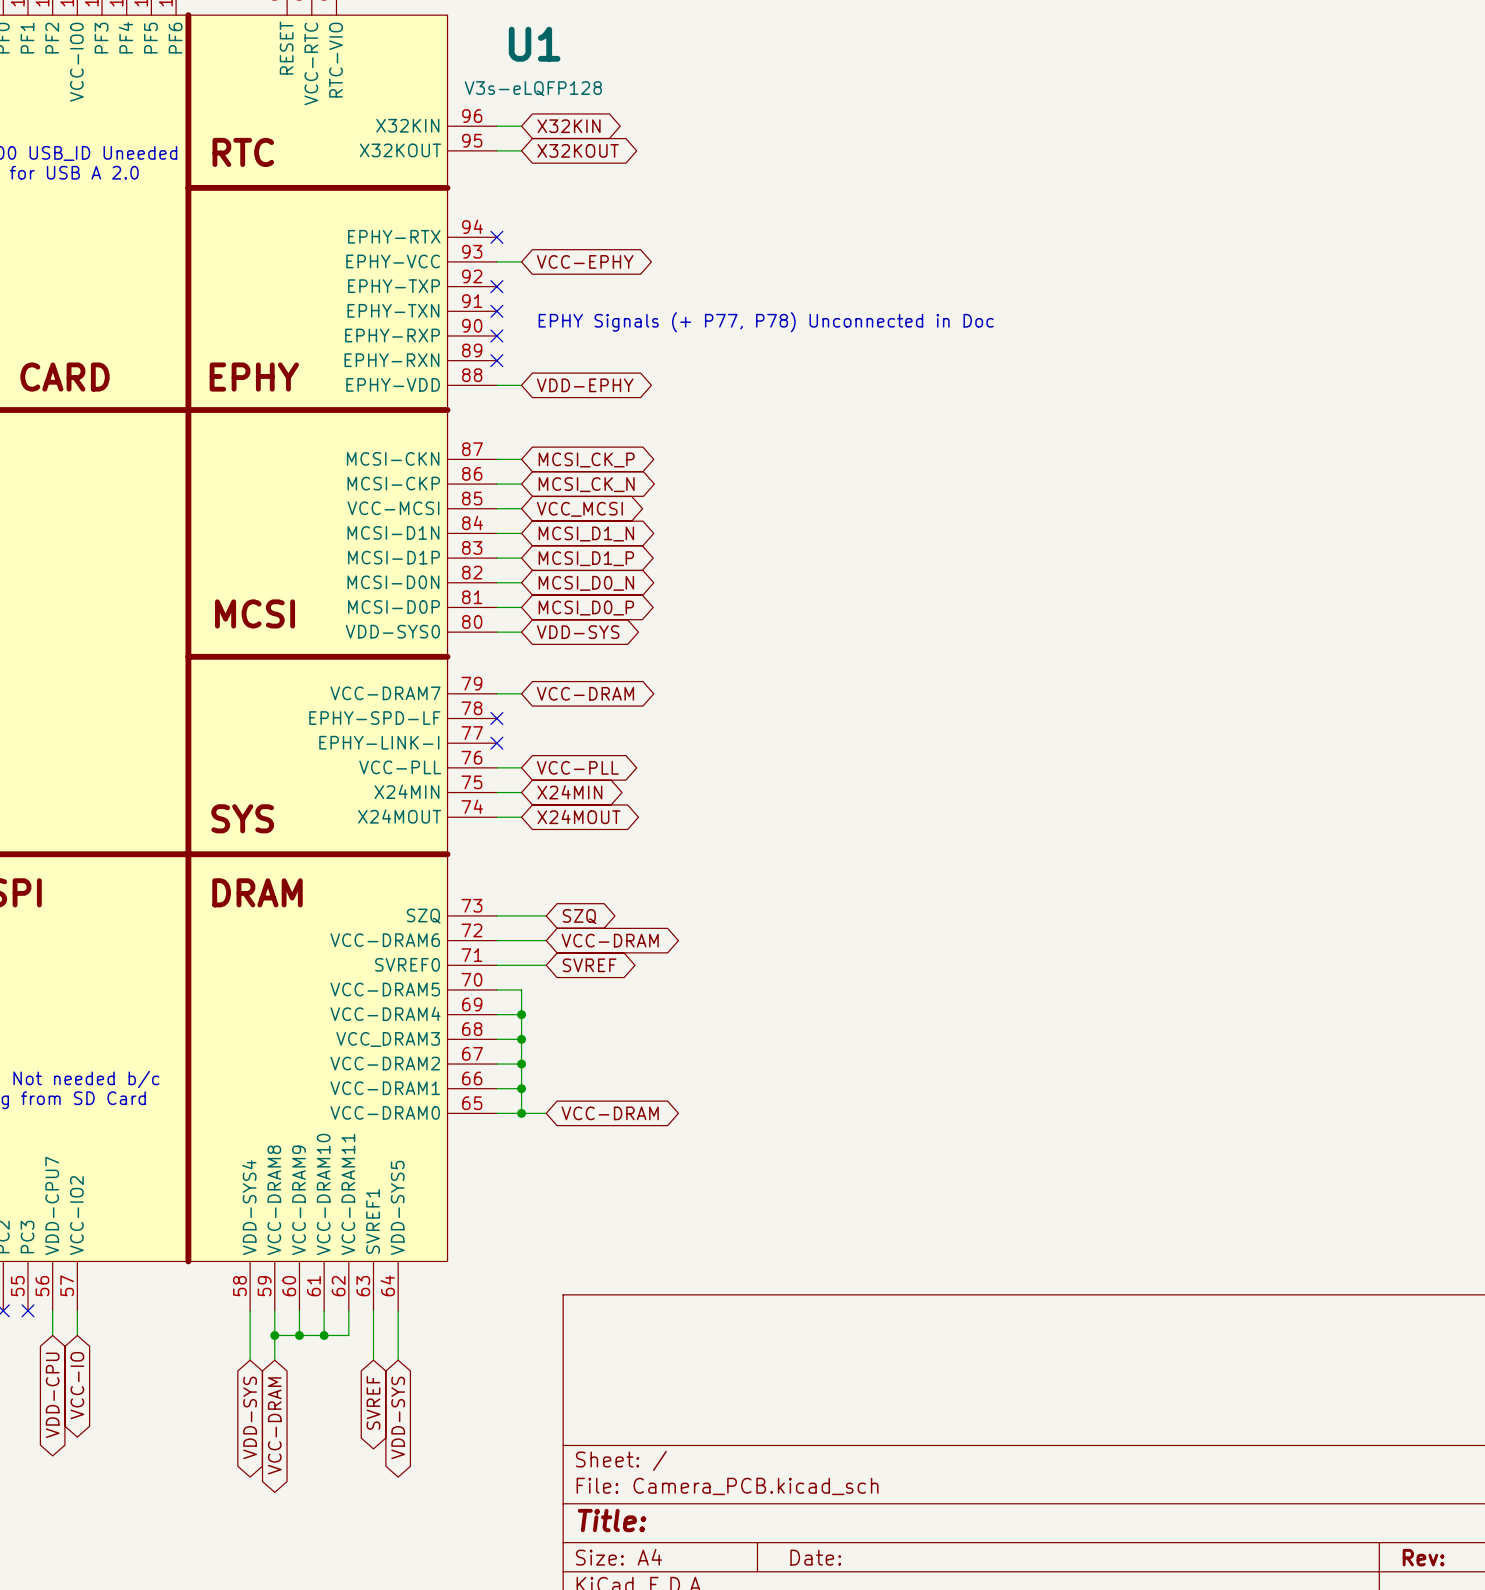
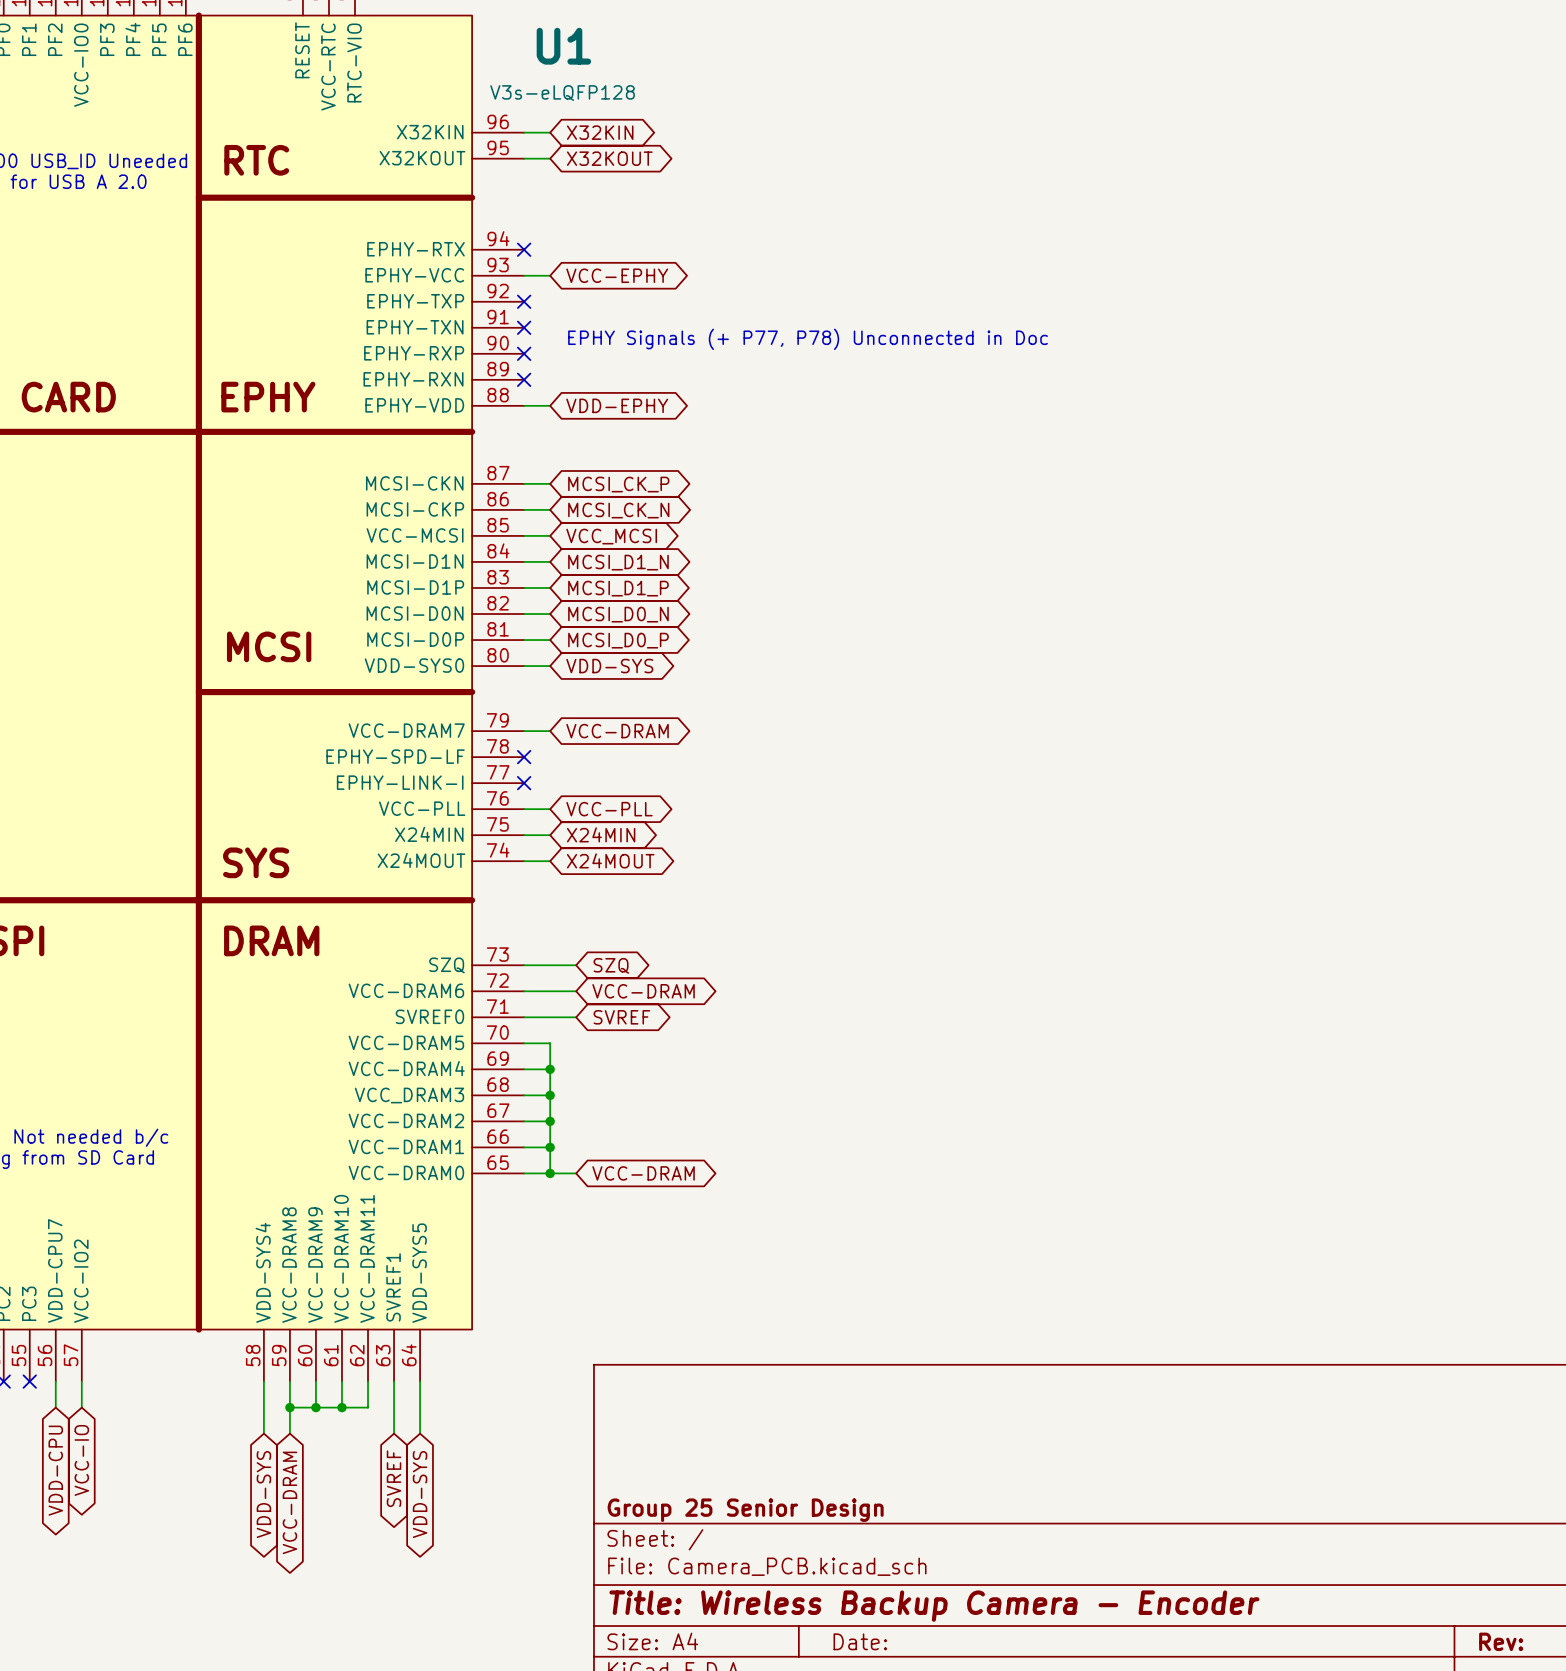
title block: none -> Group 25 Senior Design (745, 1510)
title block: Title: (612, 1520) -> Title: Wireless Backup Camera - Encoder (934, 1606)

